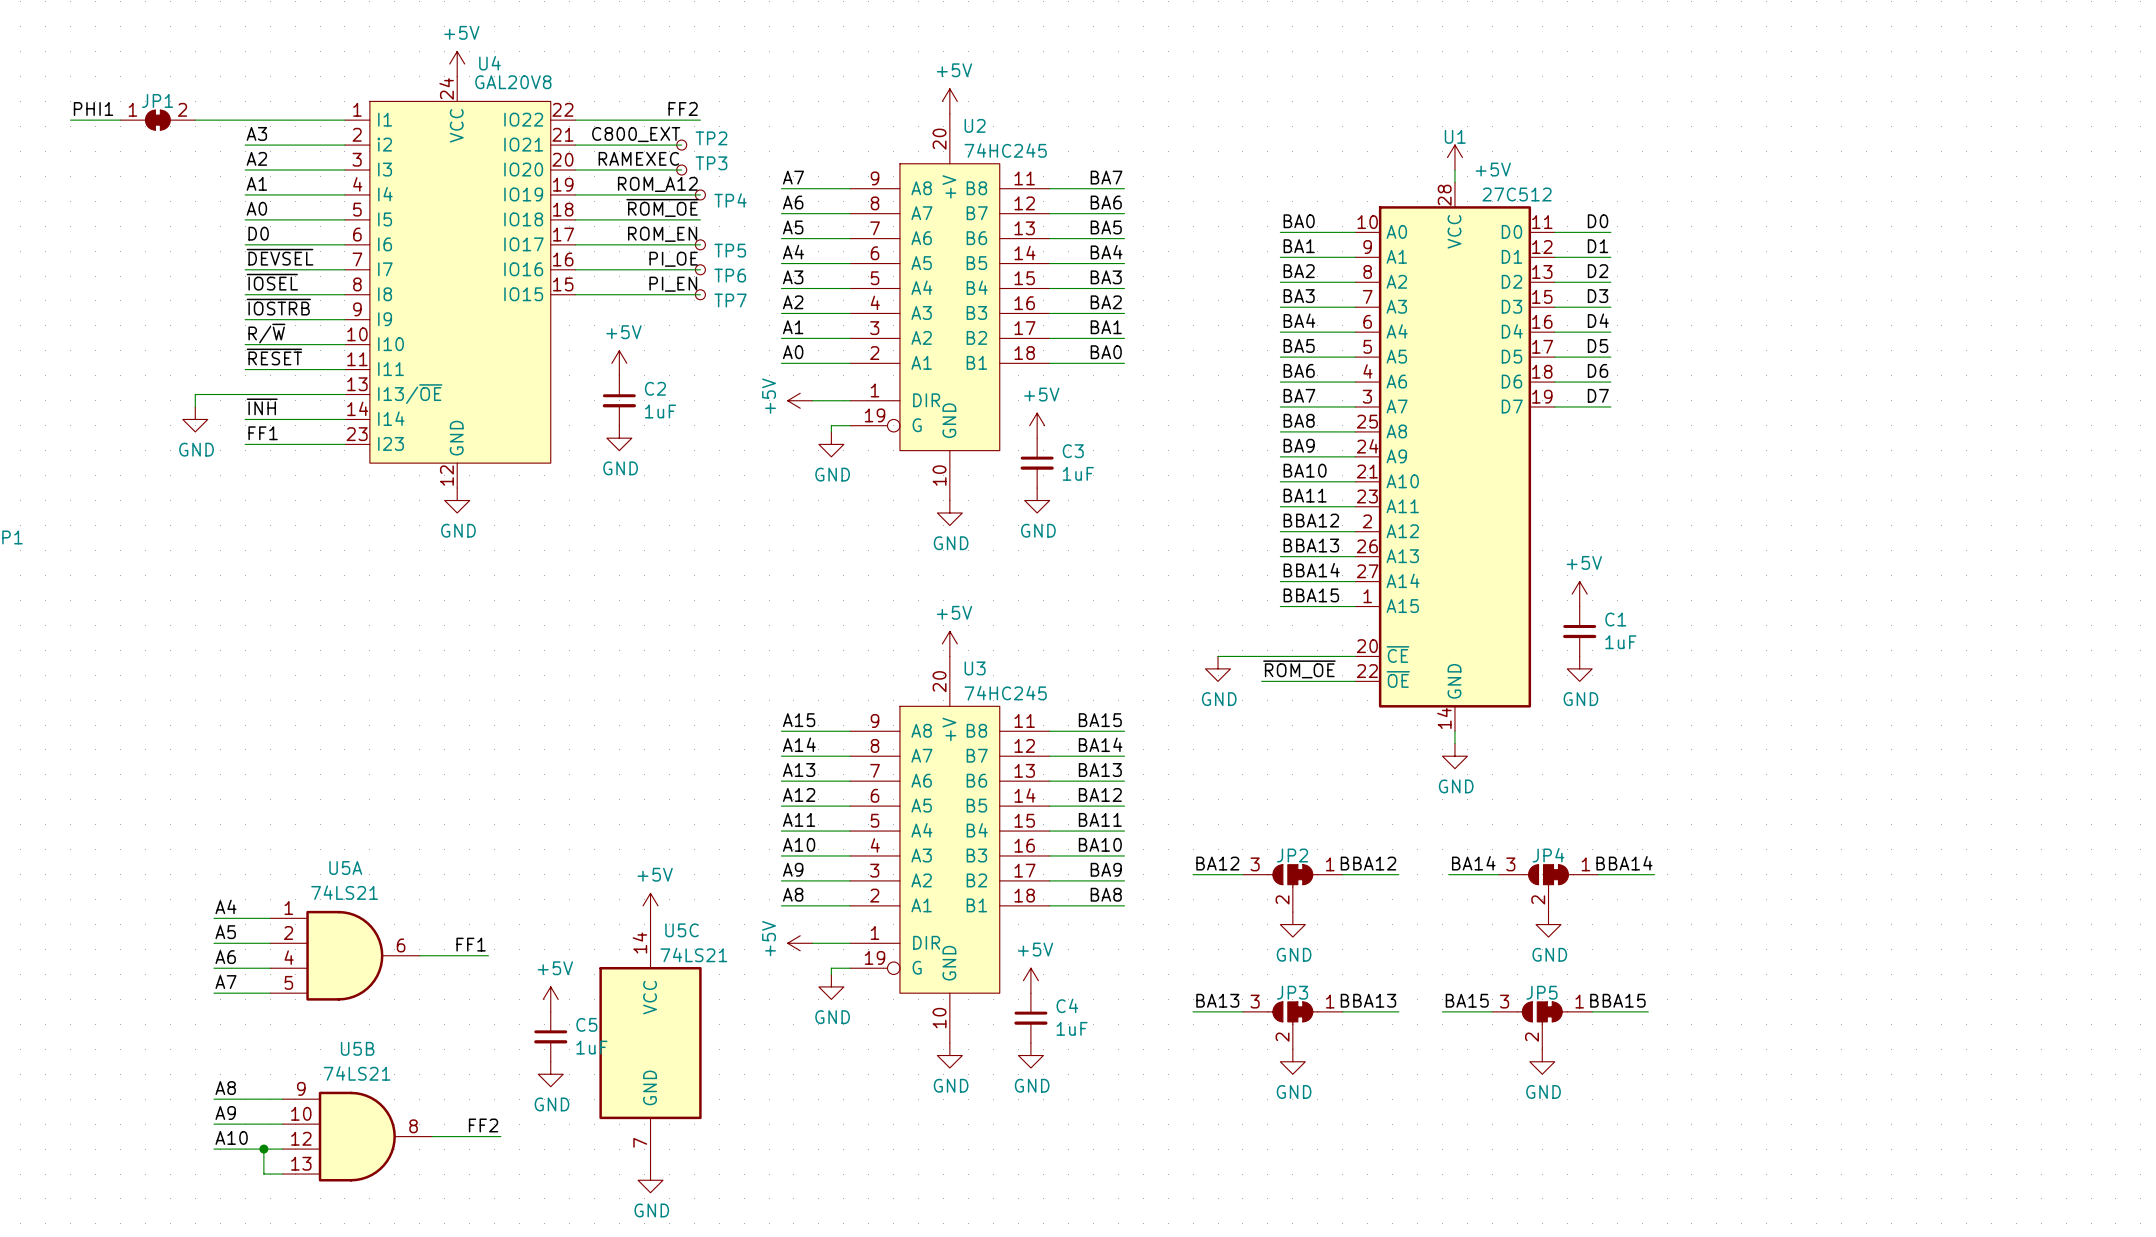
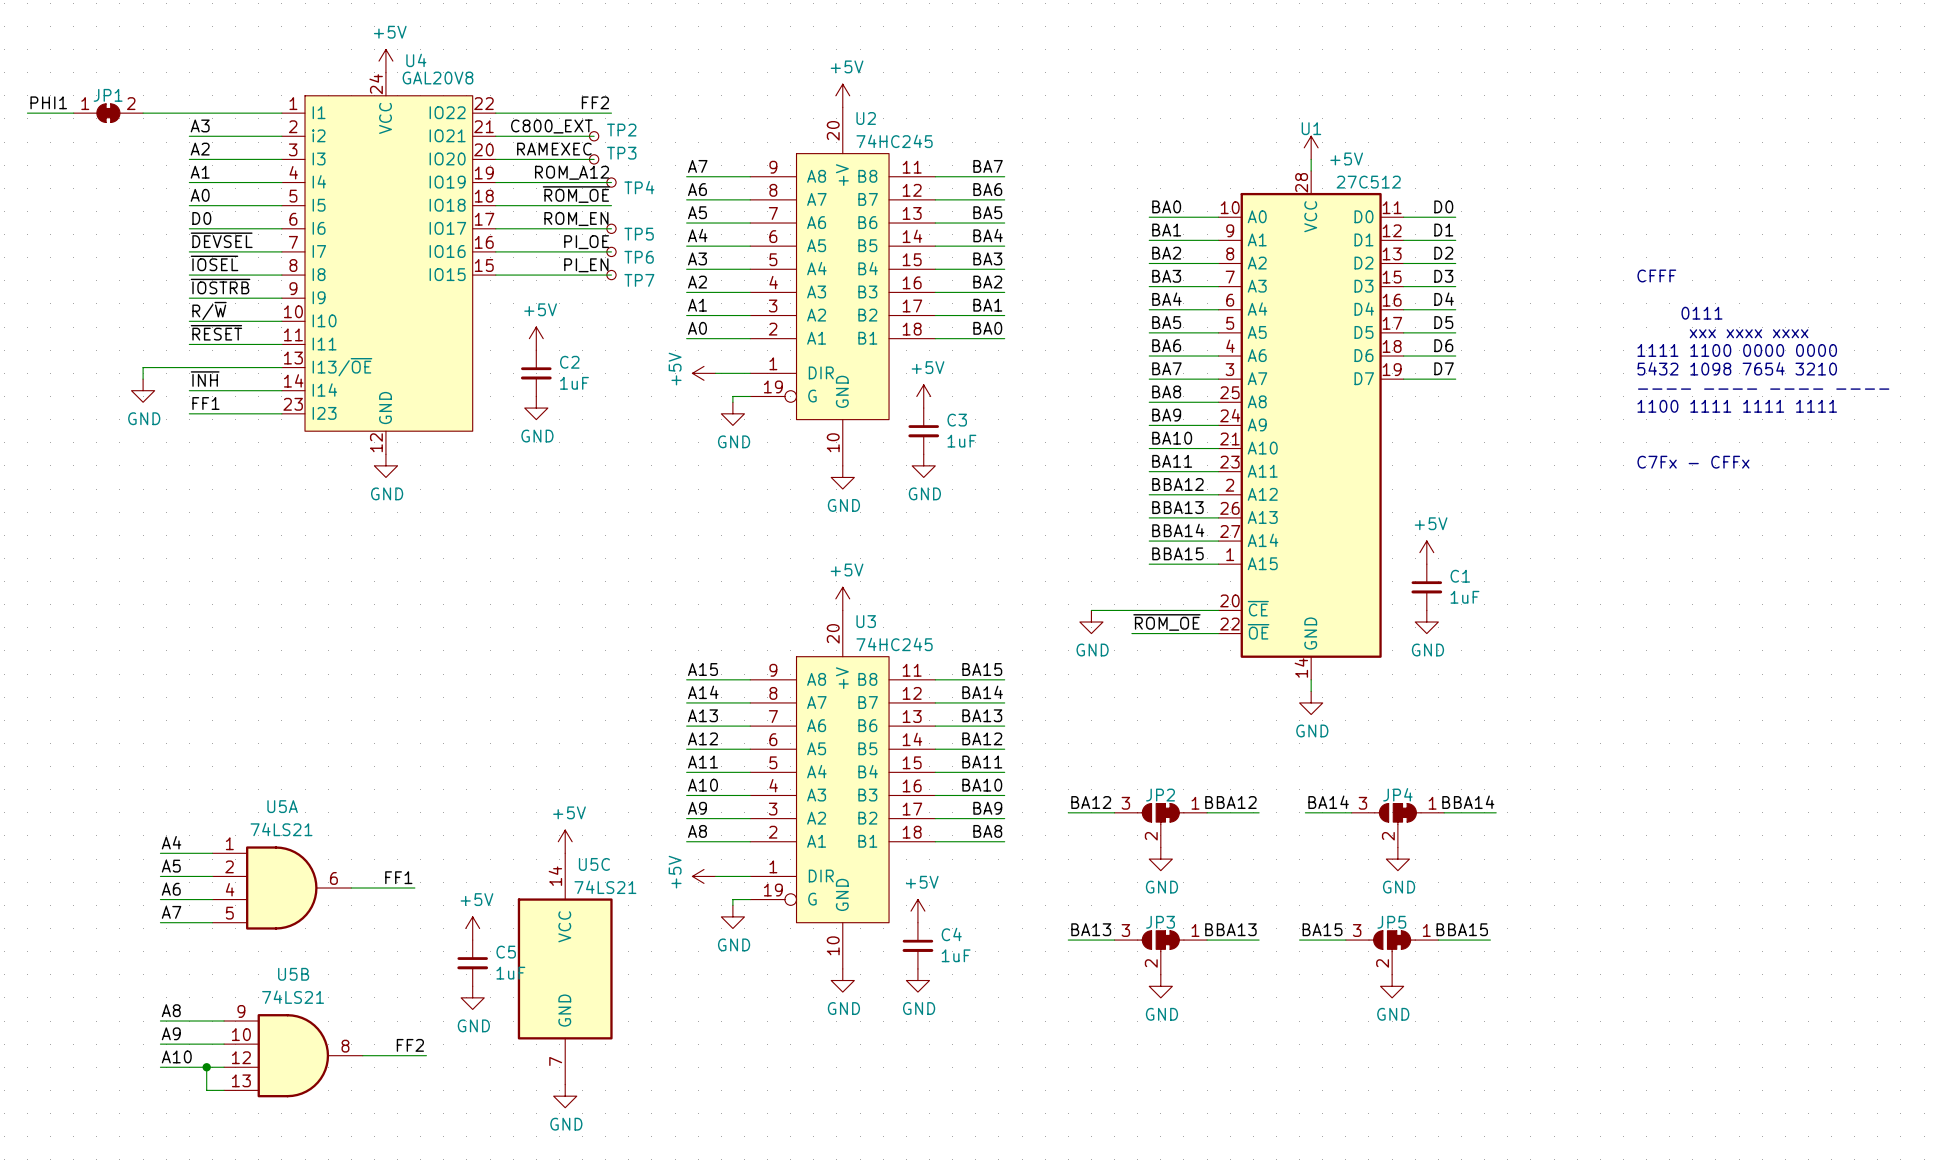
text: none -> CFFF (1656, 275)
text: none -> 0111 (1701, 313)
text: none -> xxx xxxx xxxx (1749, 333)
text: none -> 1111 1100 0000 0000 (1737, 350)
text: none -> 5432 1098 7654 3210 (1737, 368)
text: none -> ---- ---- ---- ---- (1763, 389)
text: none -> 1100 1111 1111 1111 (1737, 406)
text: none -> C7Fx - CFFx (1693, 462)

